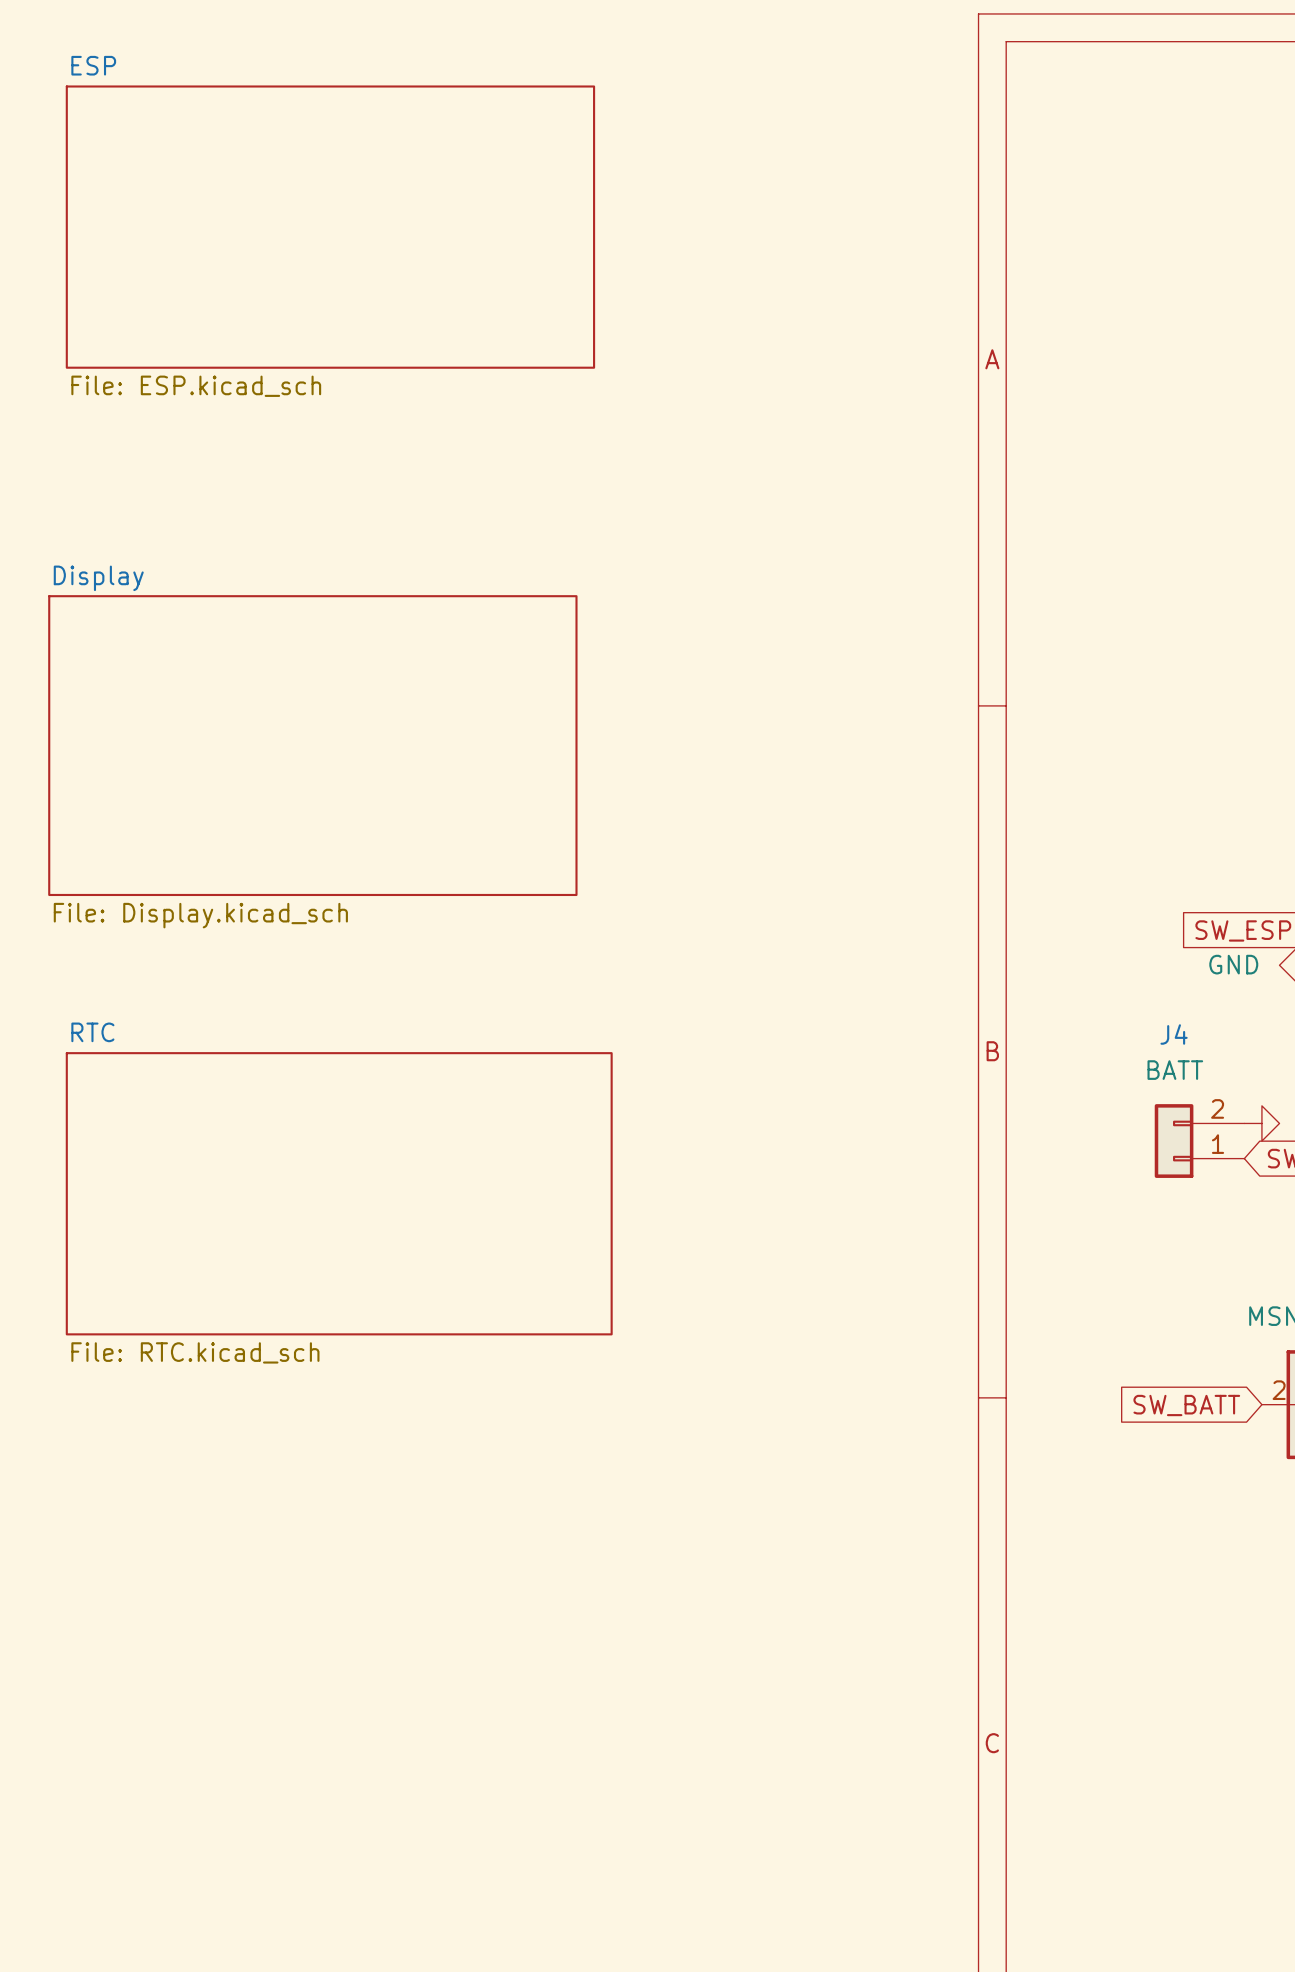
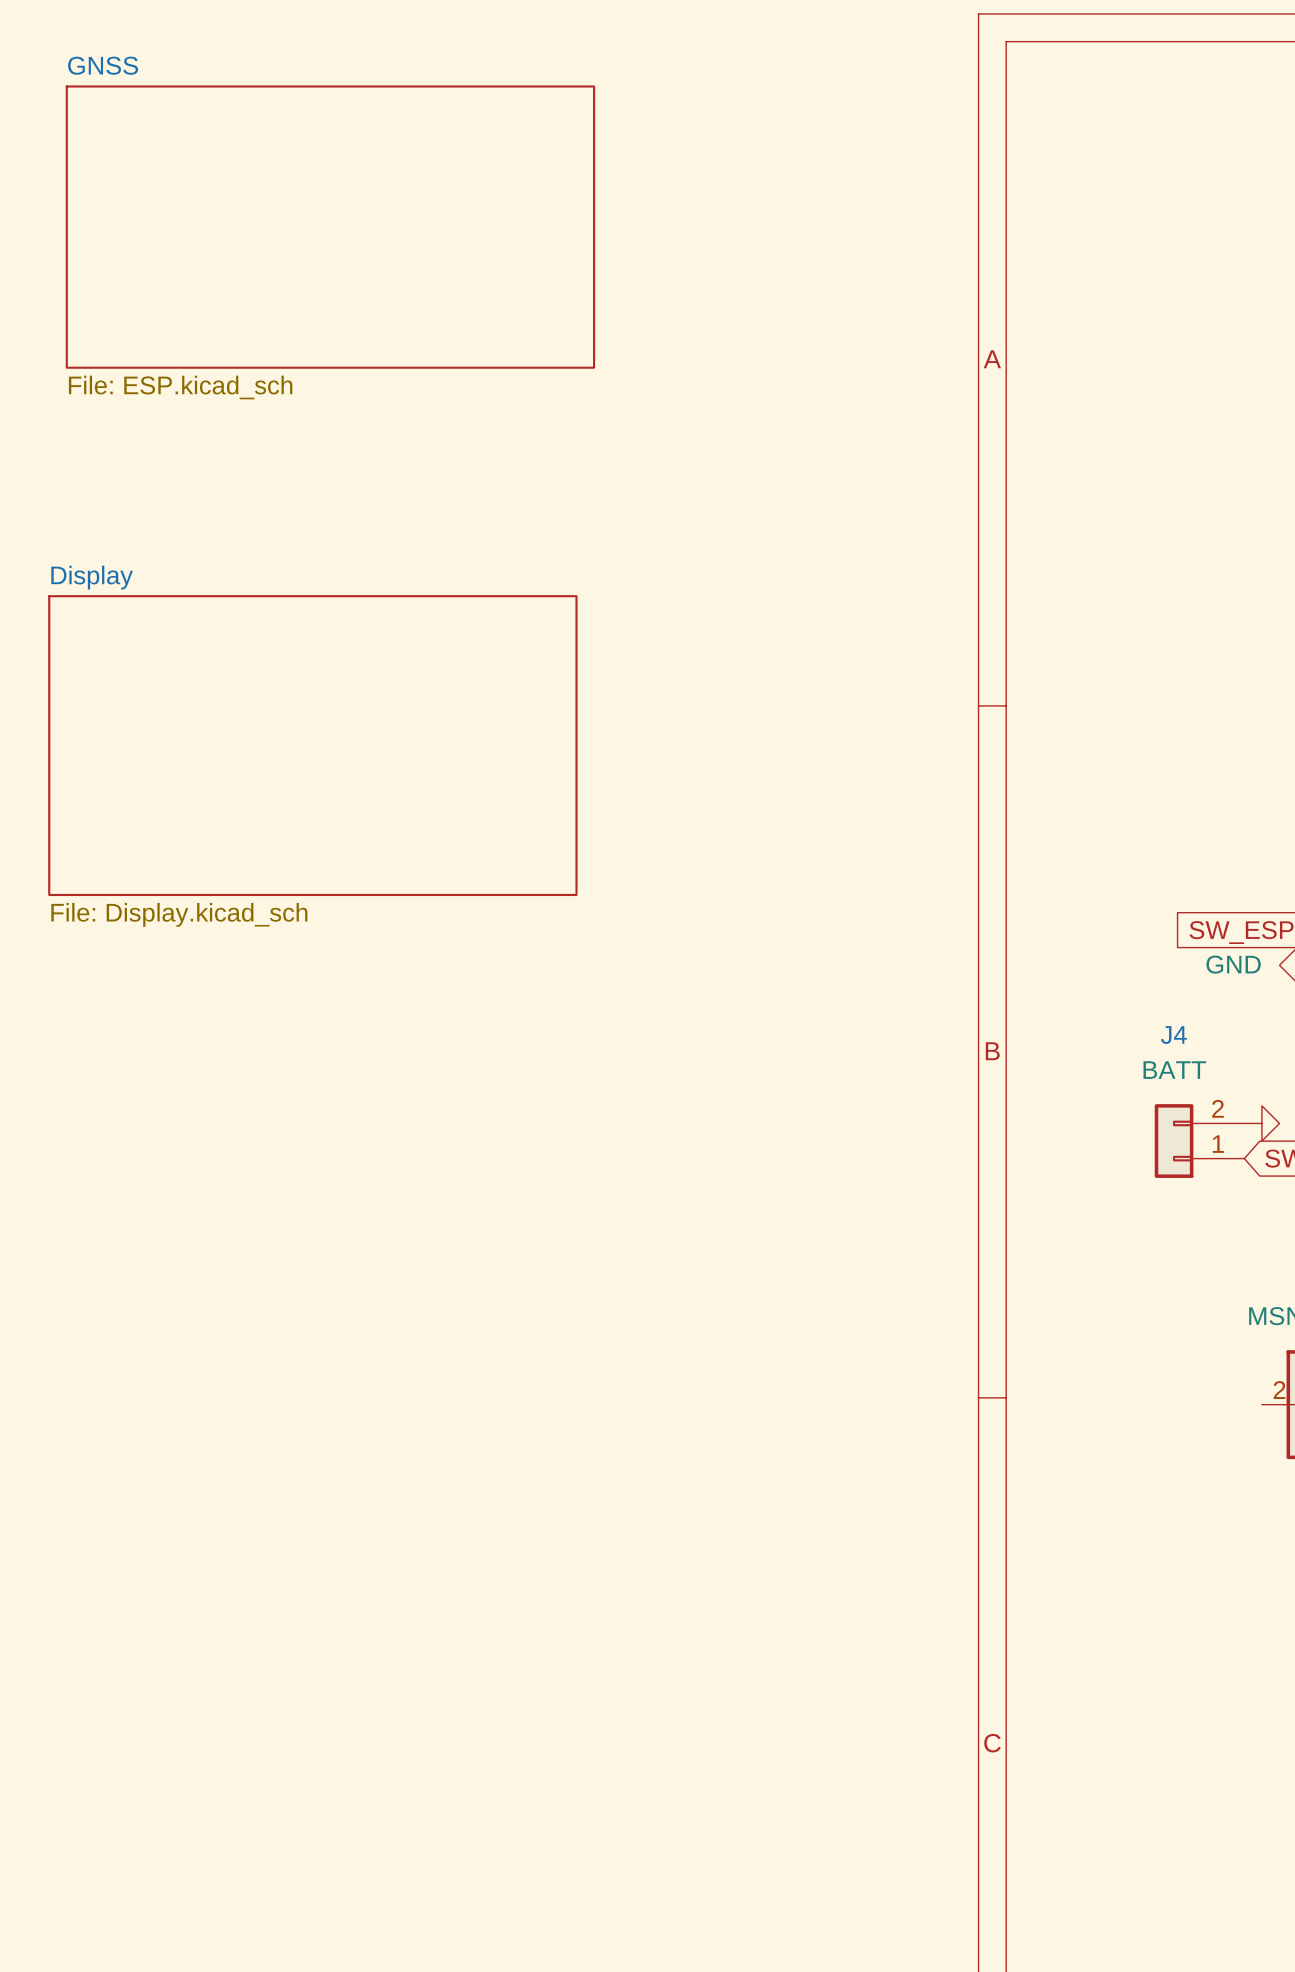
sheet ESP name: ESP (93, 65) -> GNSS (103, 65)
sheet RTC: File: RTC.kicad_sch (339, 1193) -> none
global label: SW_BATT (1186, 1405) -> none

